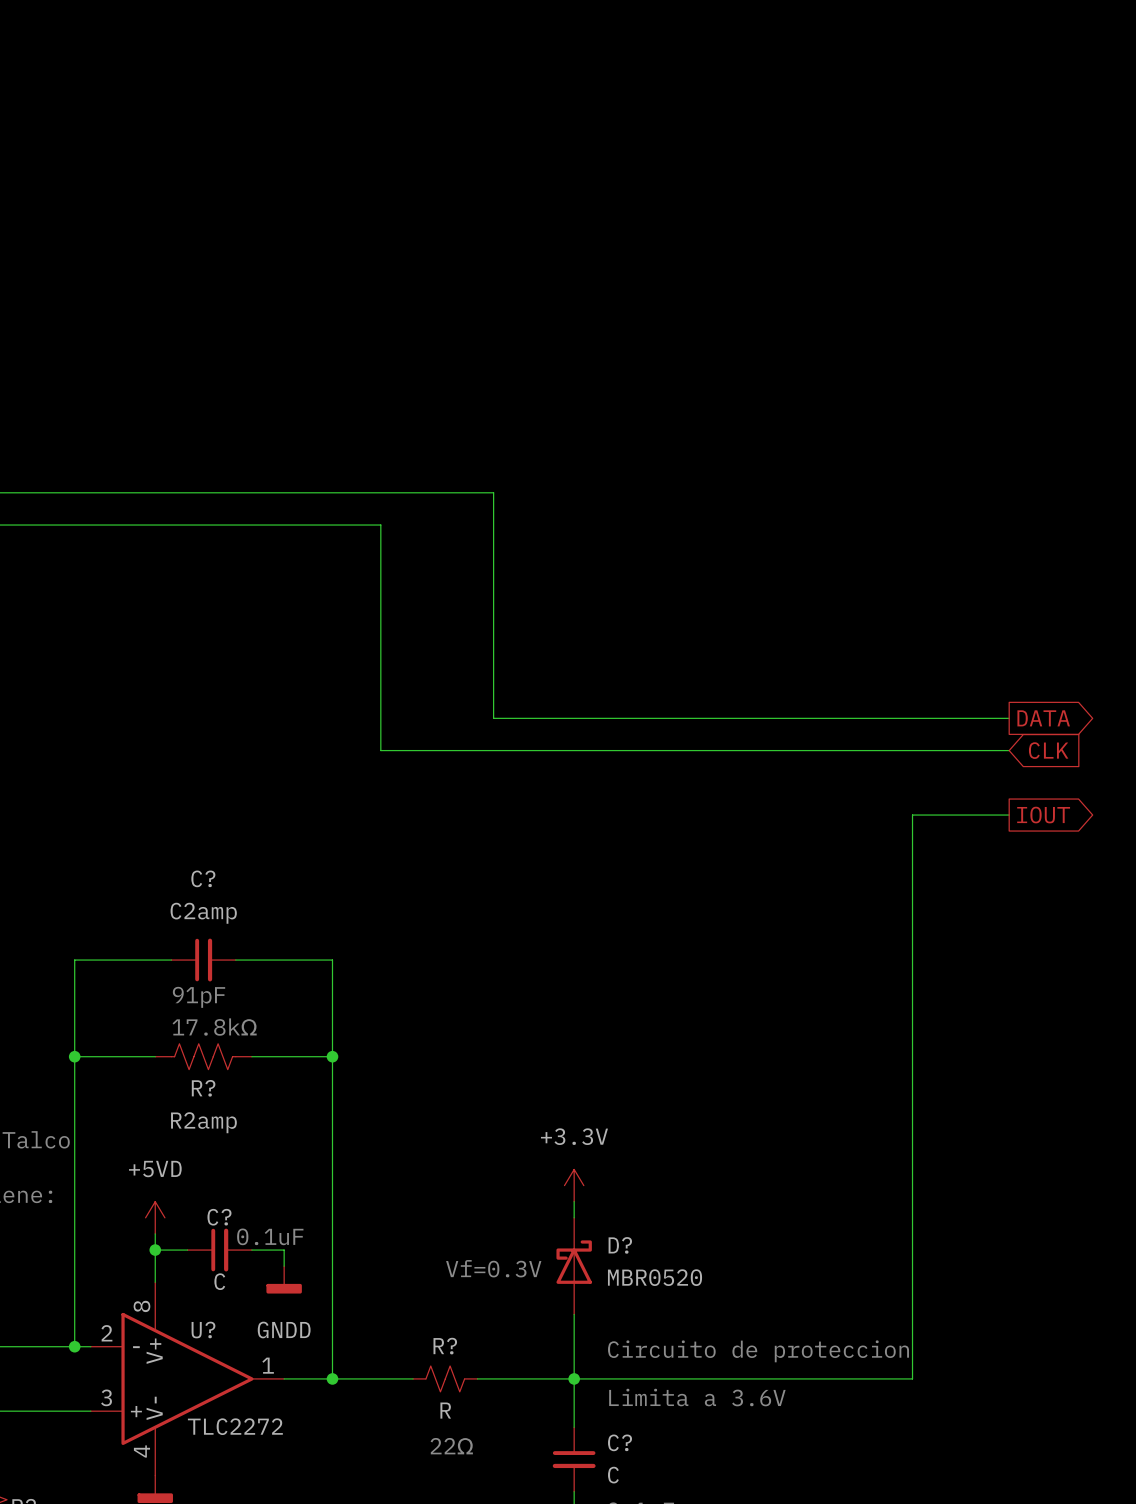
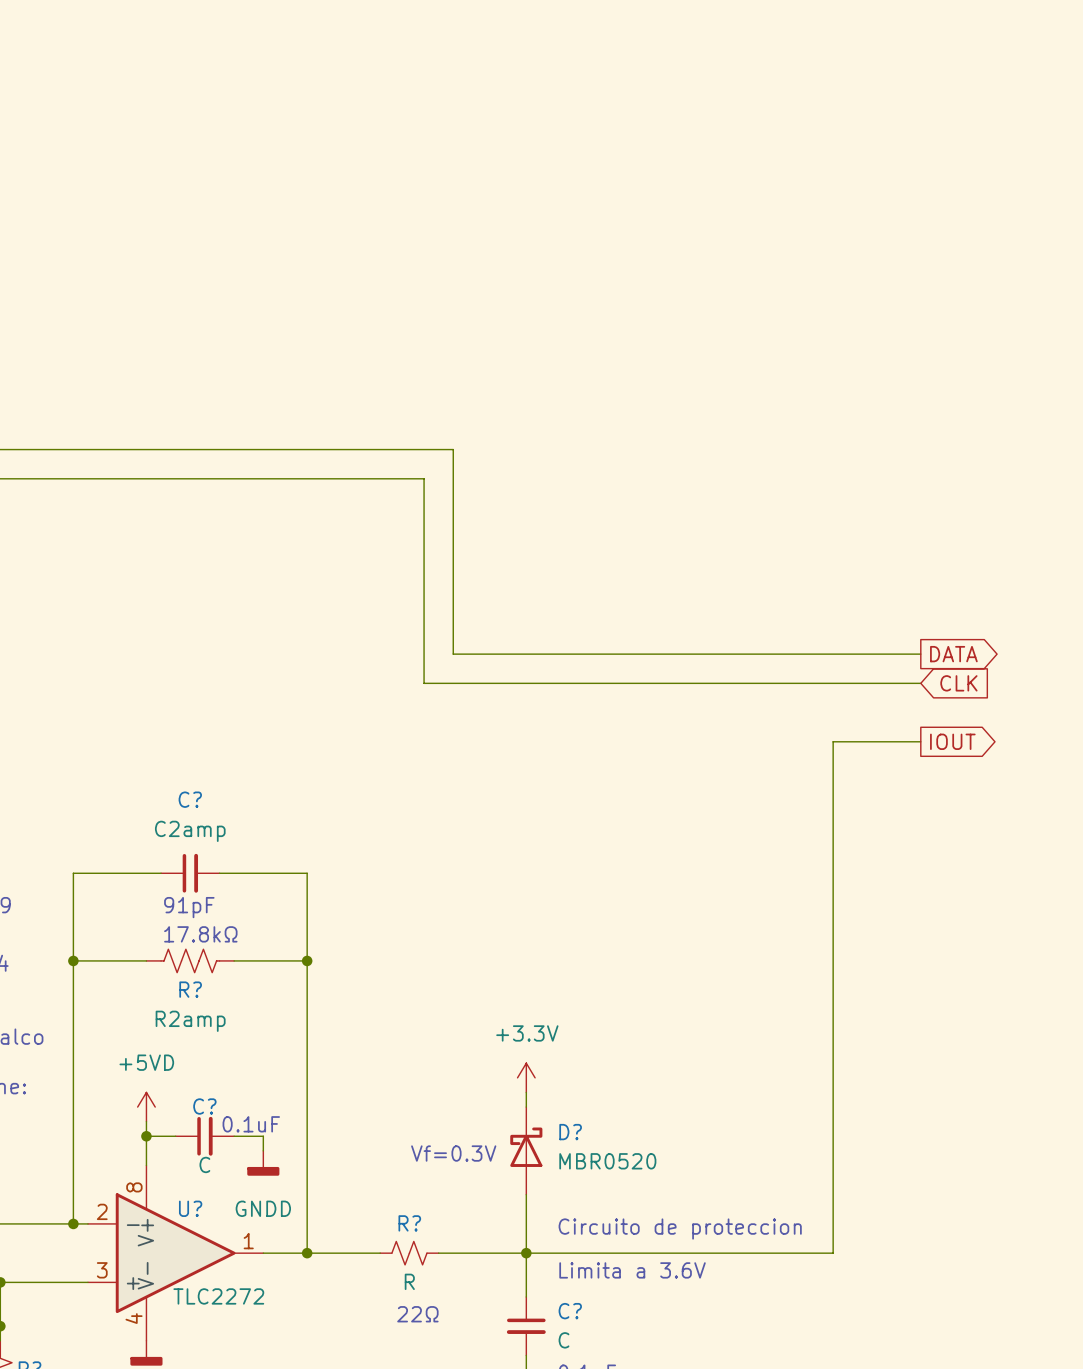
wire: (380, 525) (380, 750) (461, 750) -> (350, 478) (424, 478) (424, 683)

